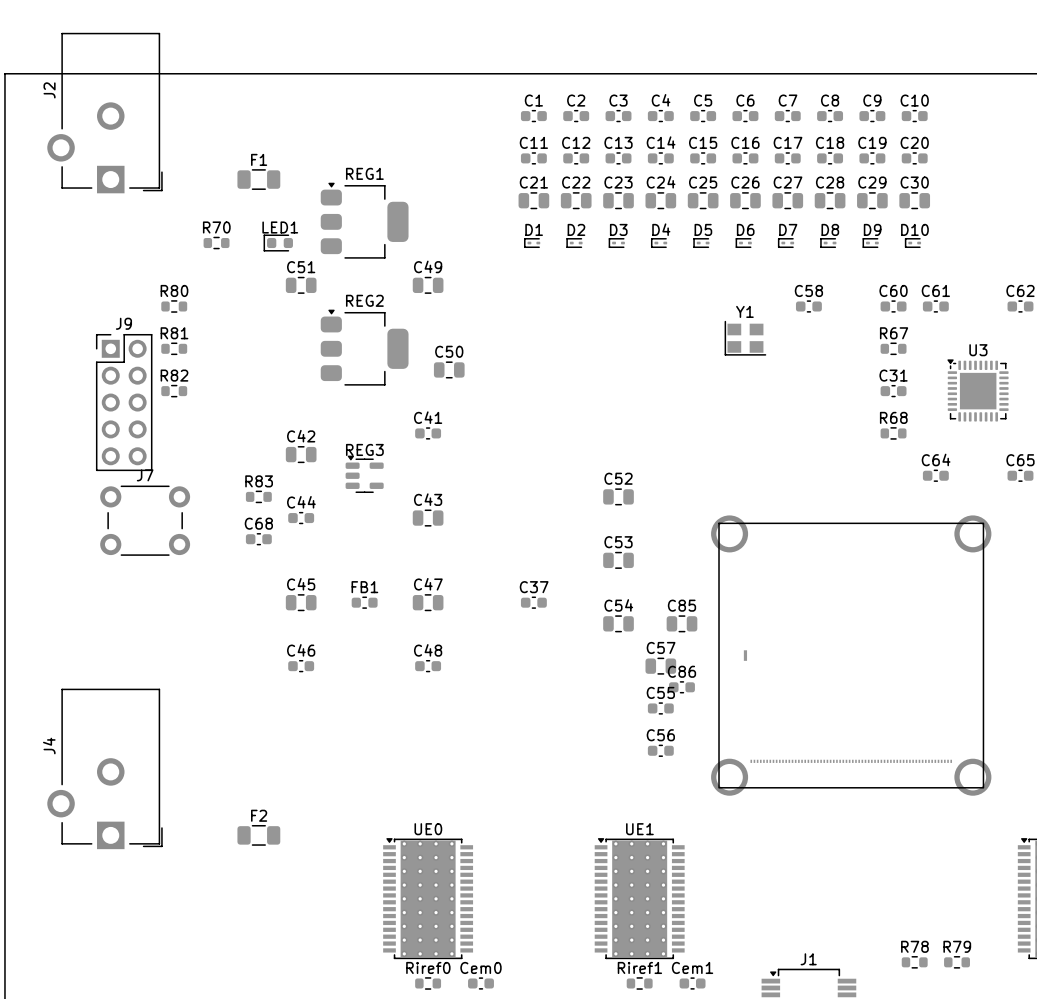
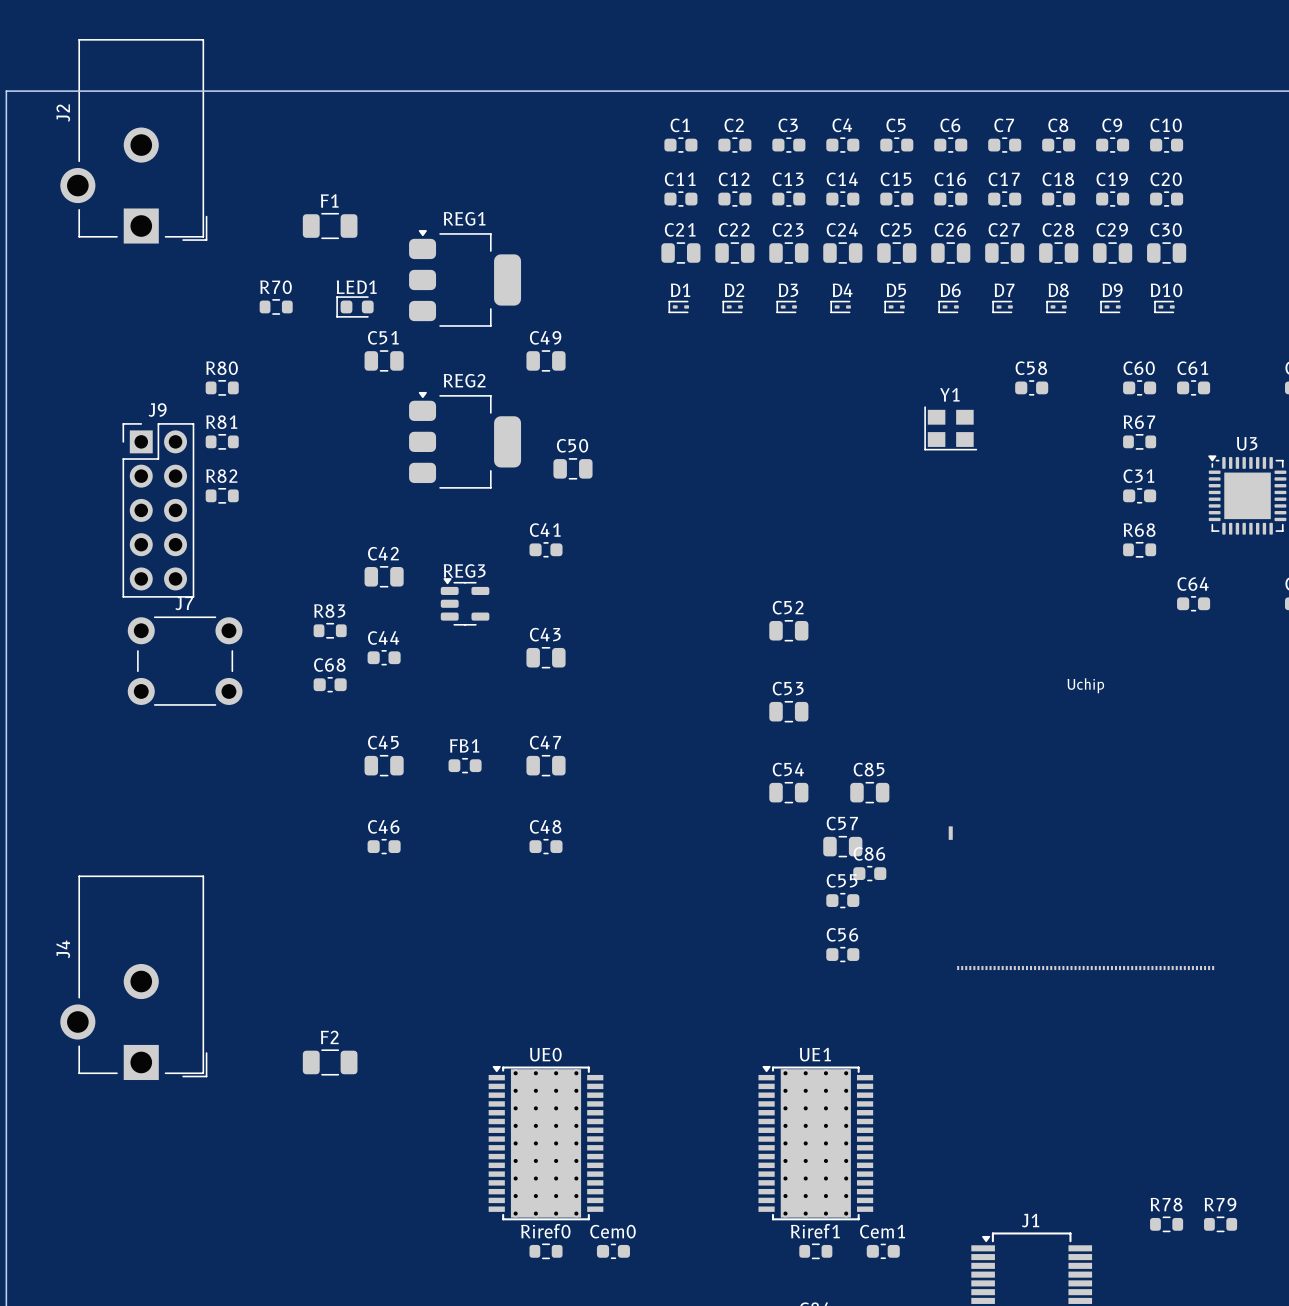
C37: (533, 602) -> none
part: (851, 655) -> none
Uchip: none -> (1081, 898)

